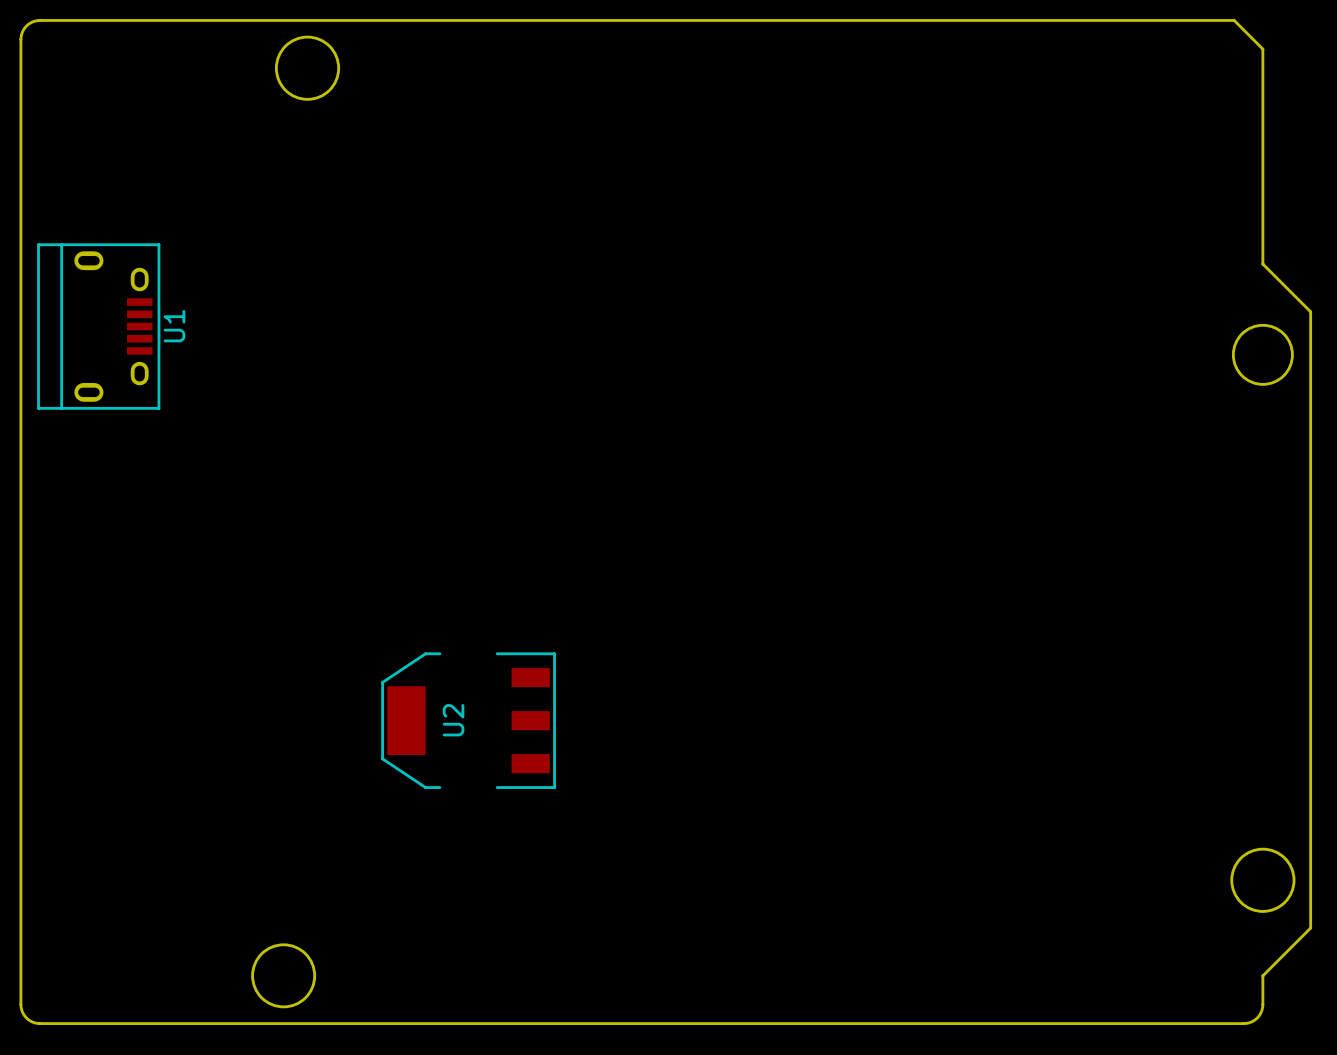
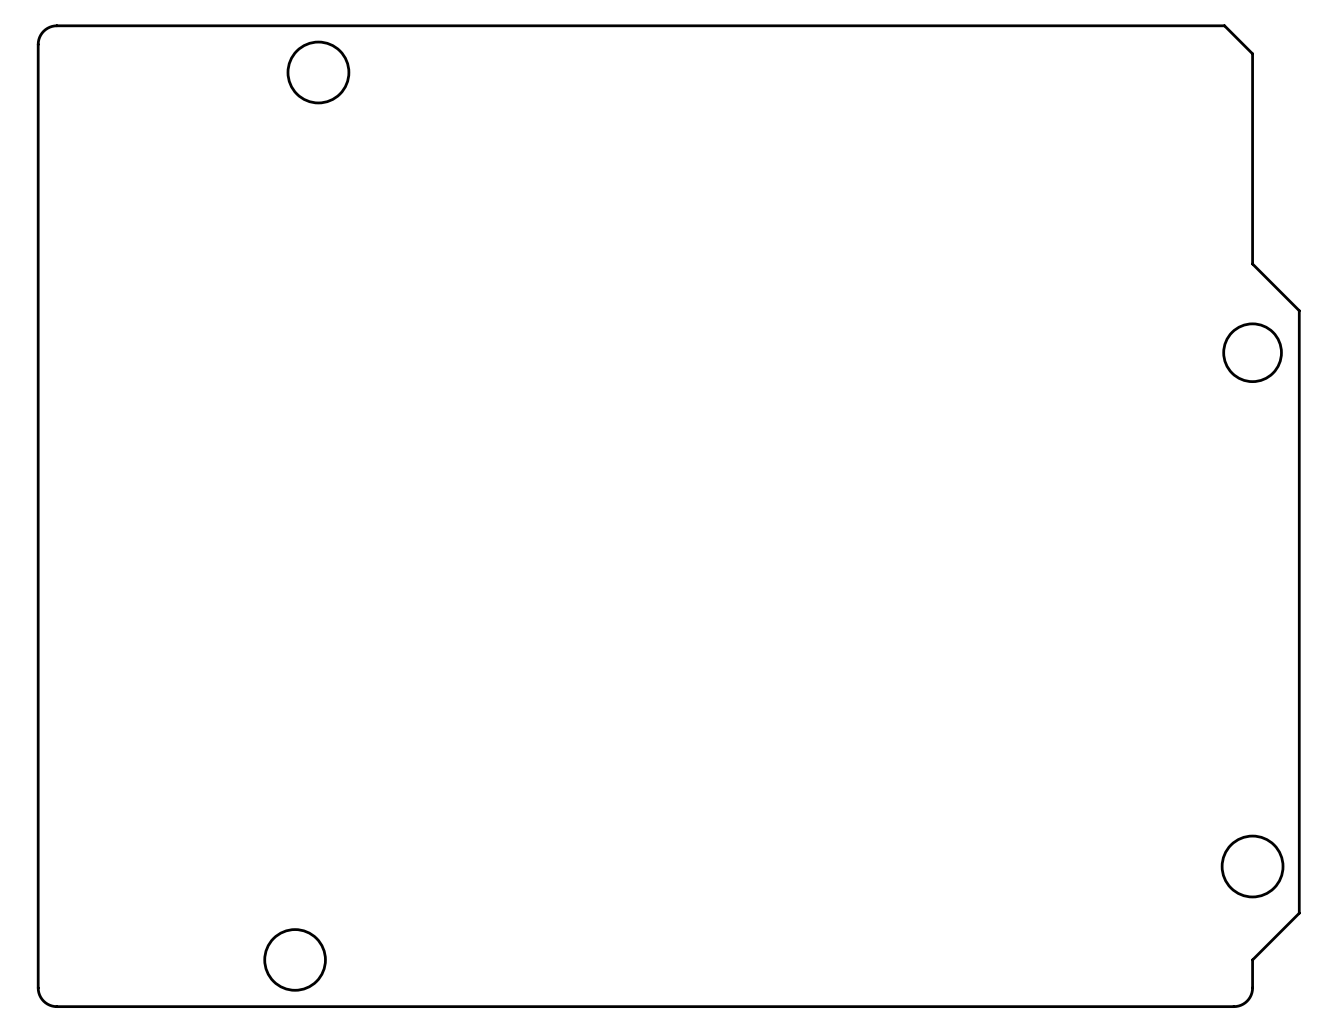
U1: (98, 326) -> none
U2: (468, 720) -> none

